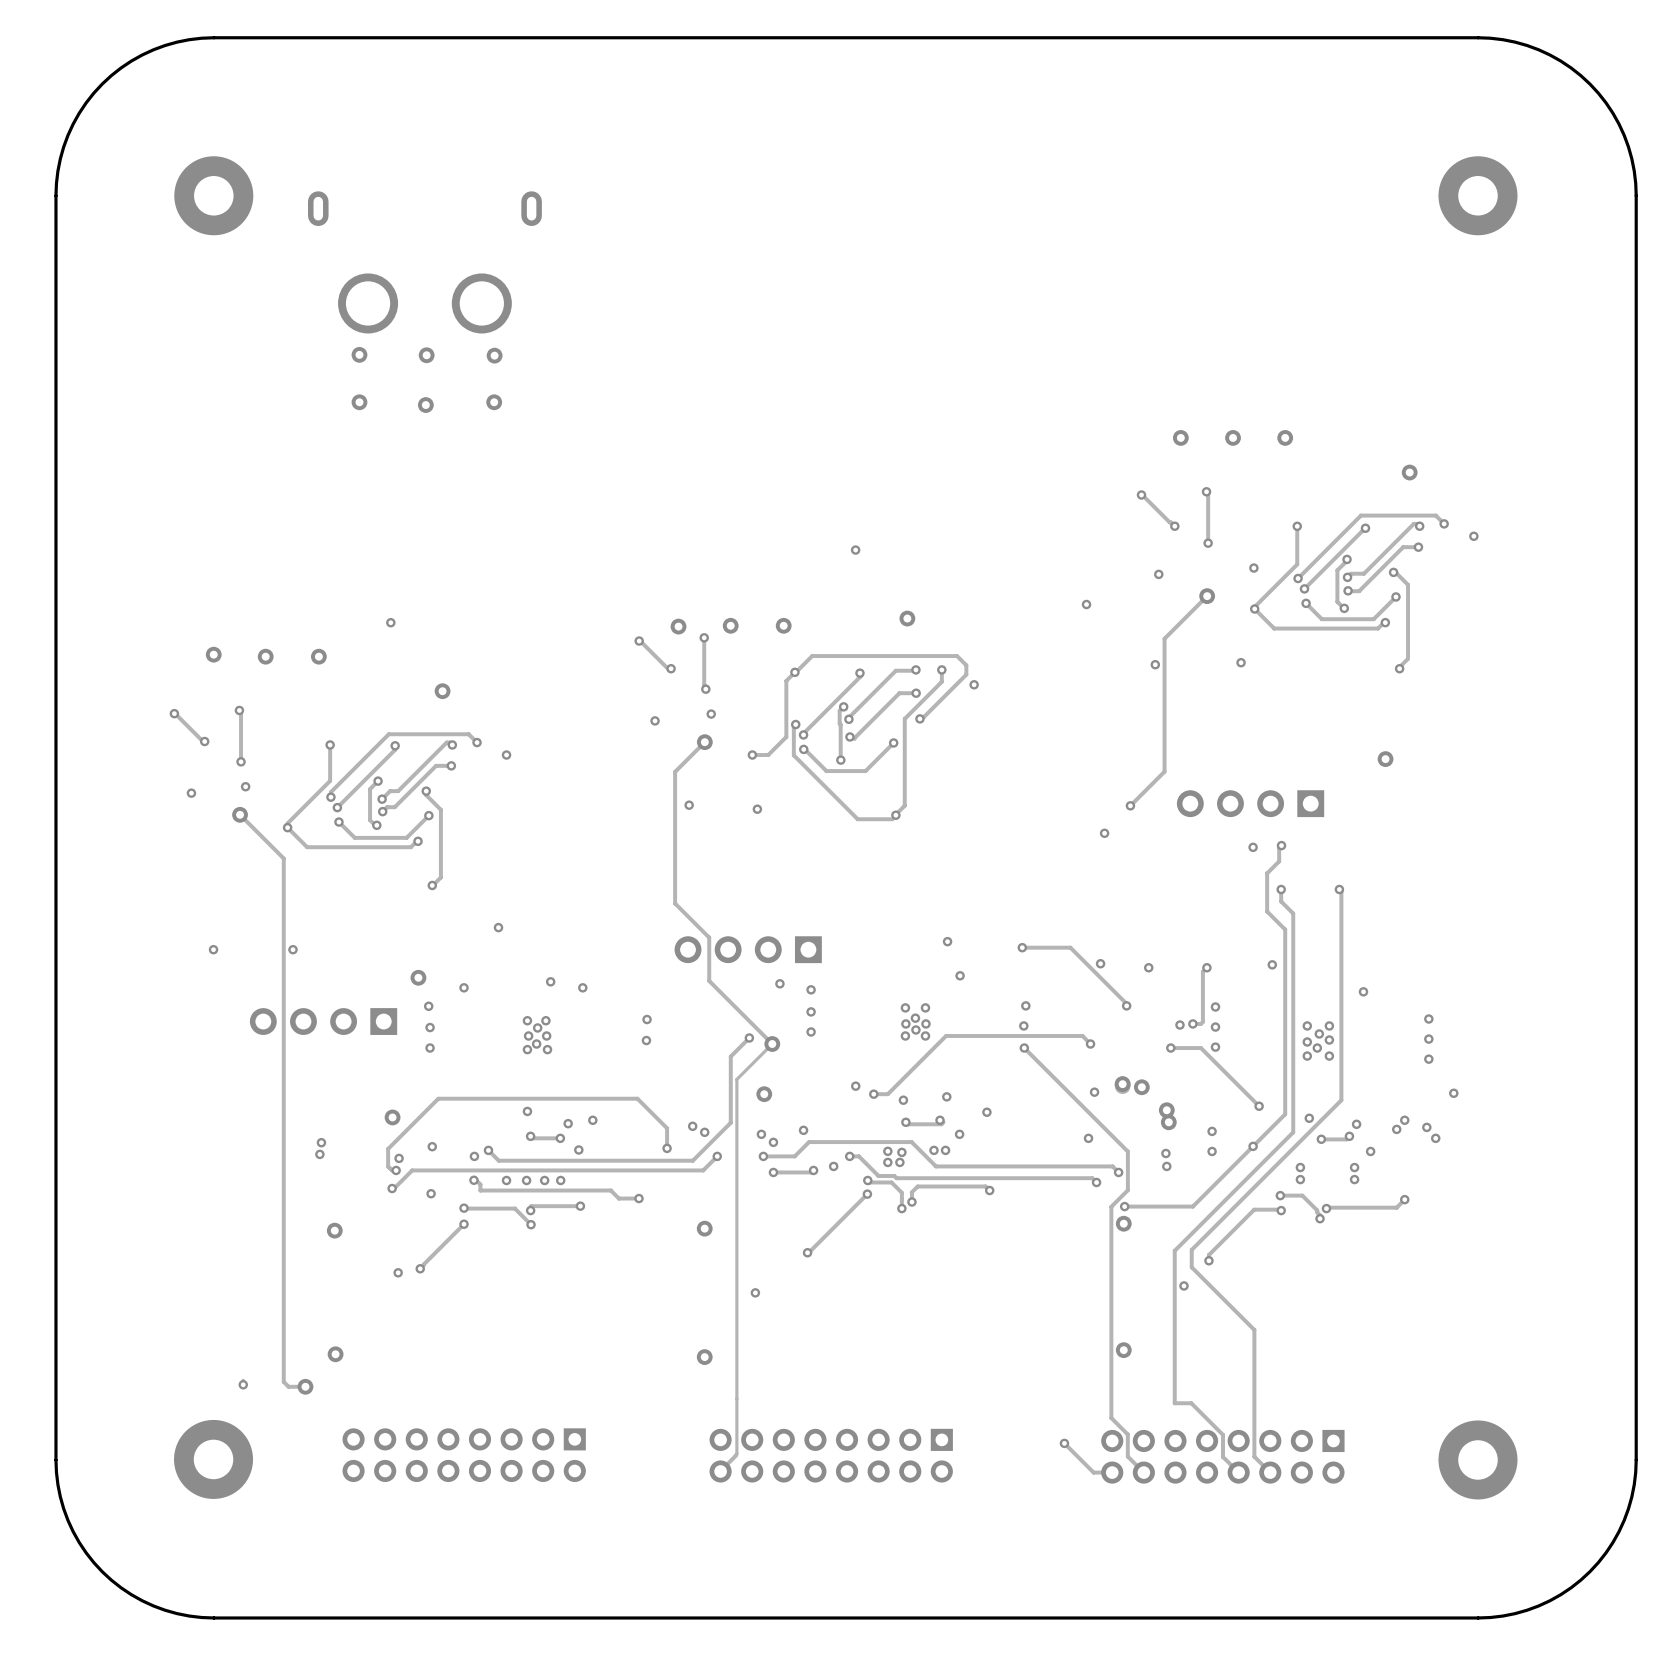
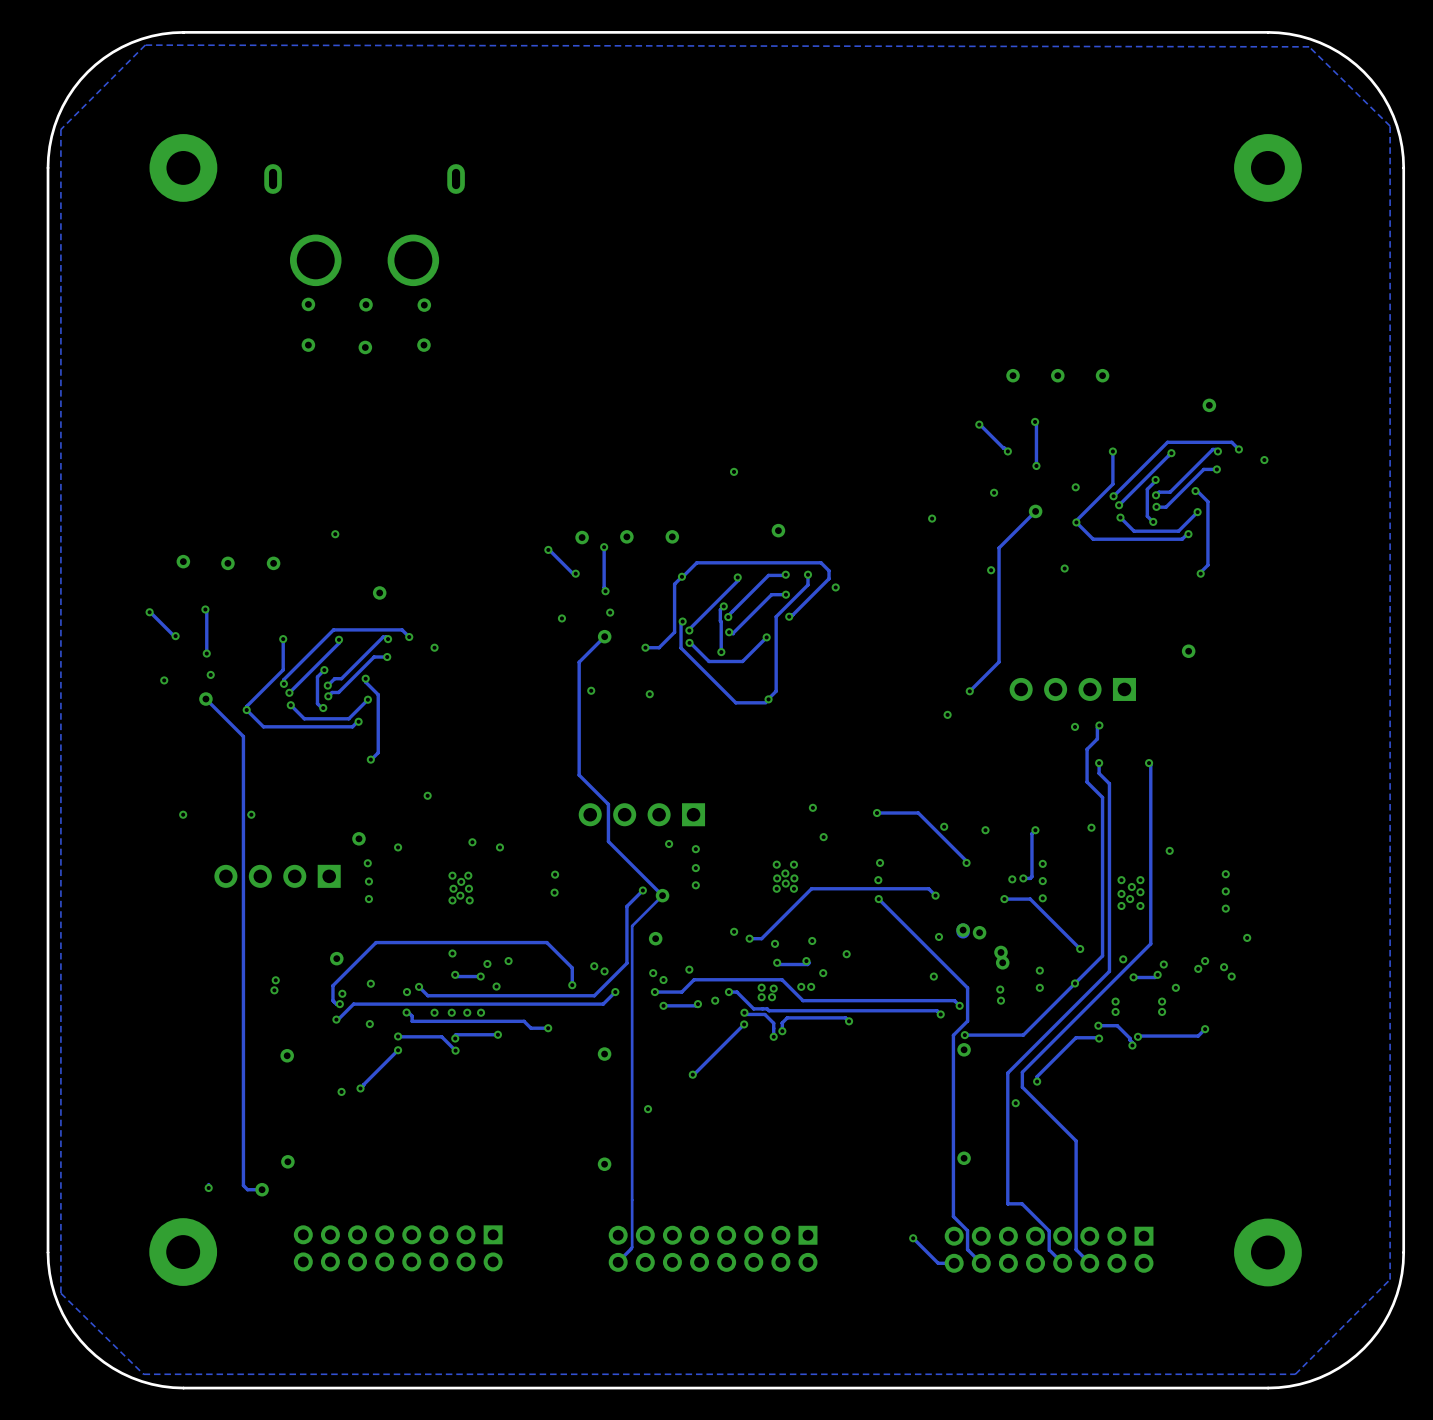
zone outline: none -> (145, 45) (1309, 46) (1390, 126) (1390, 1279) (1295, 1374) (143, 1374) (60, 1293) (60, 129) (145, 45)

